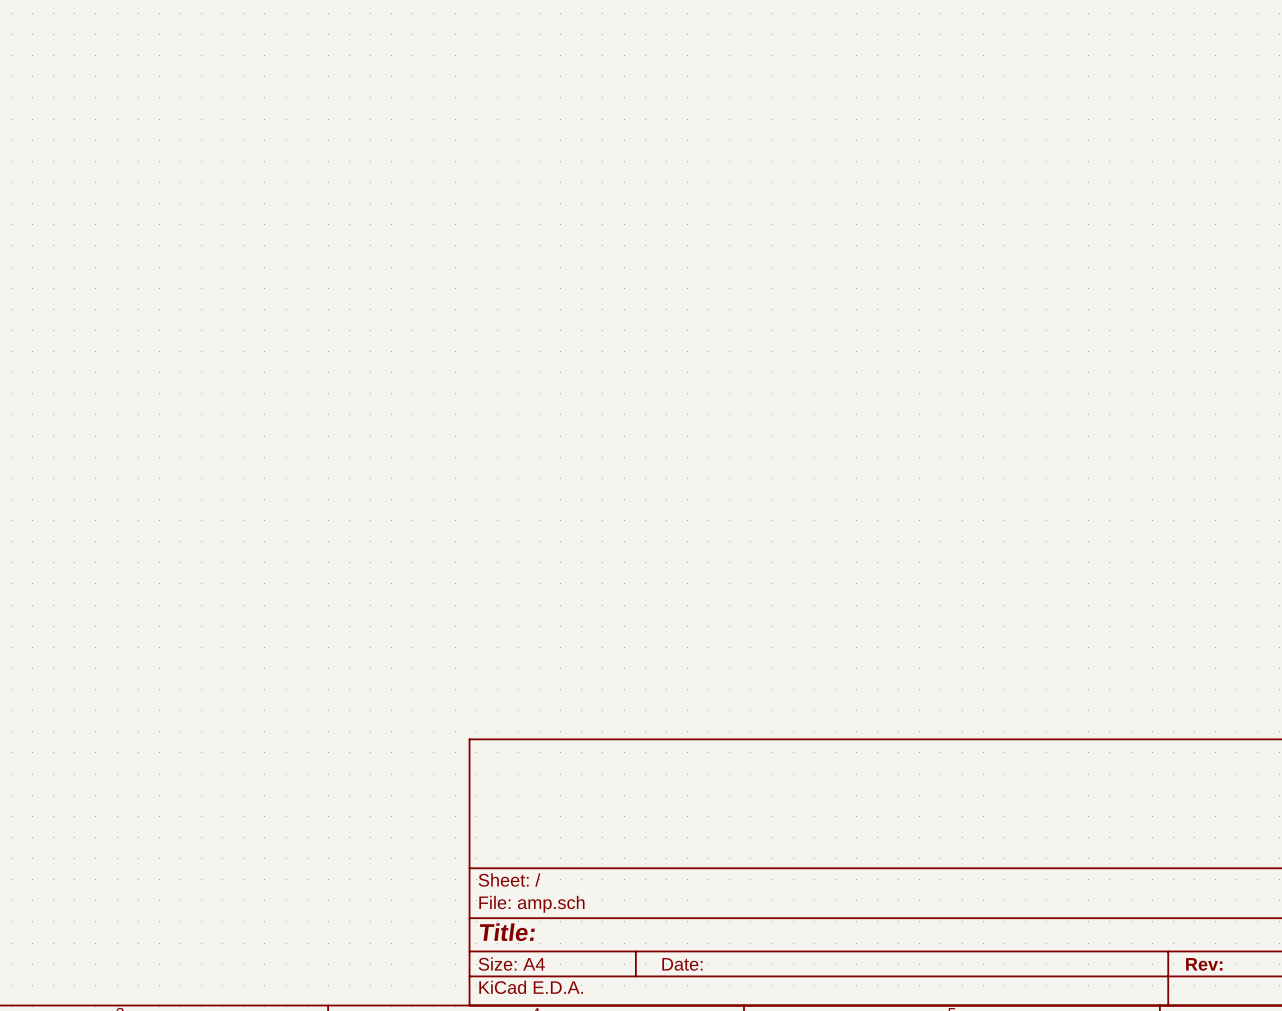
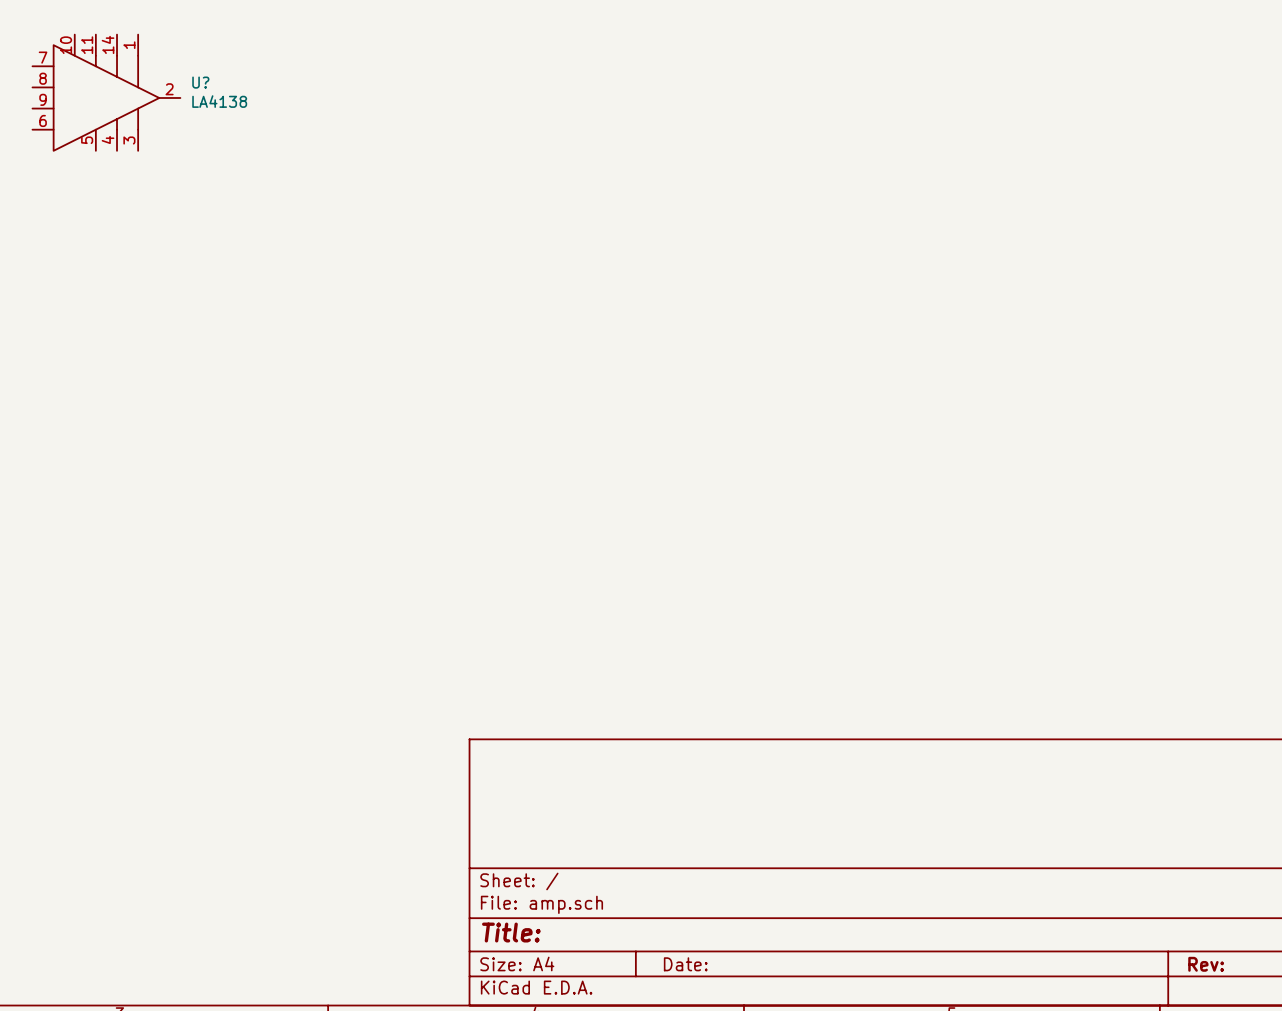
U?: none -> LA4138 (106, 92)

